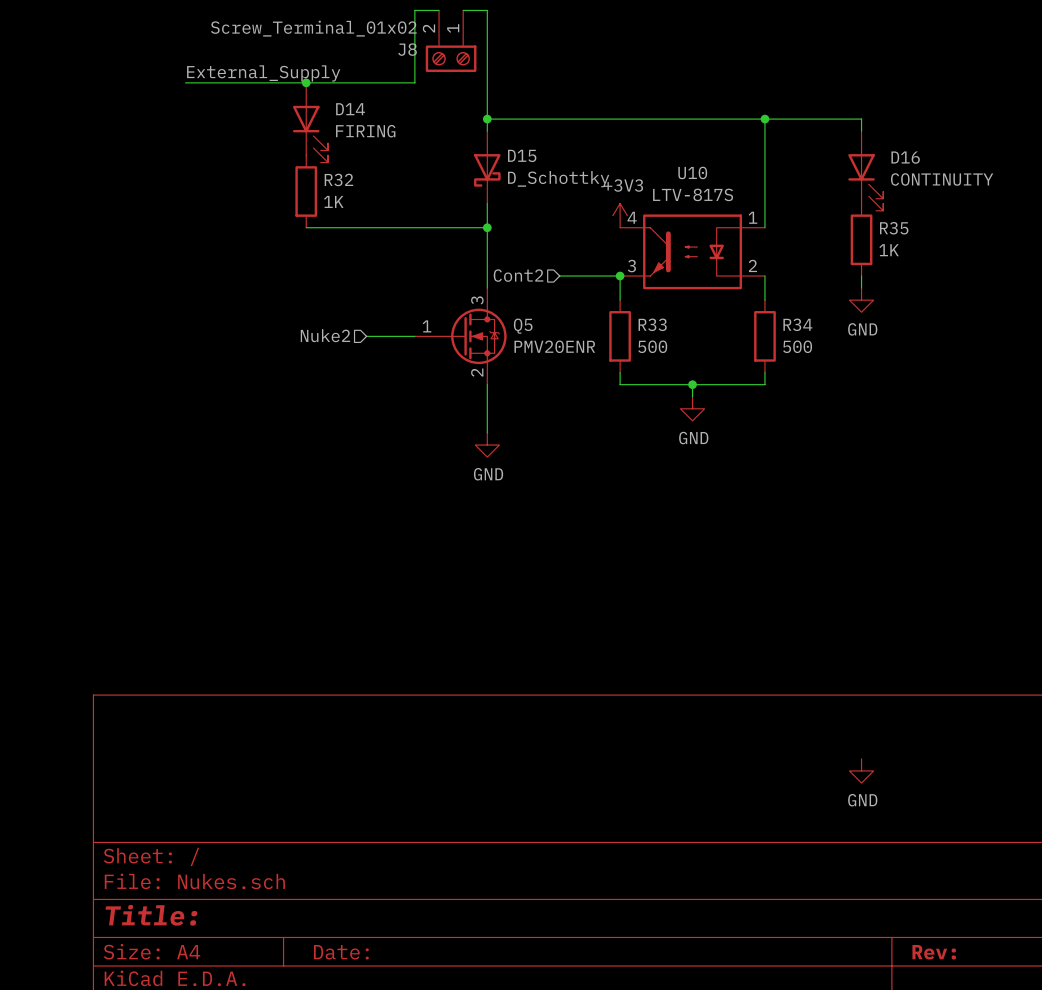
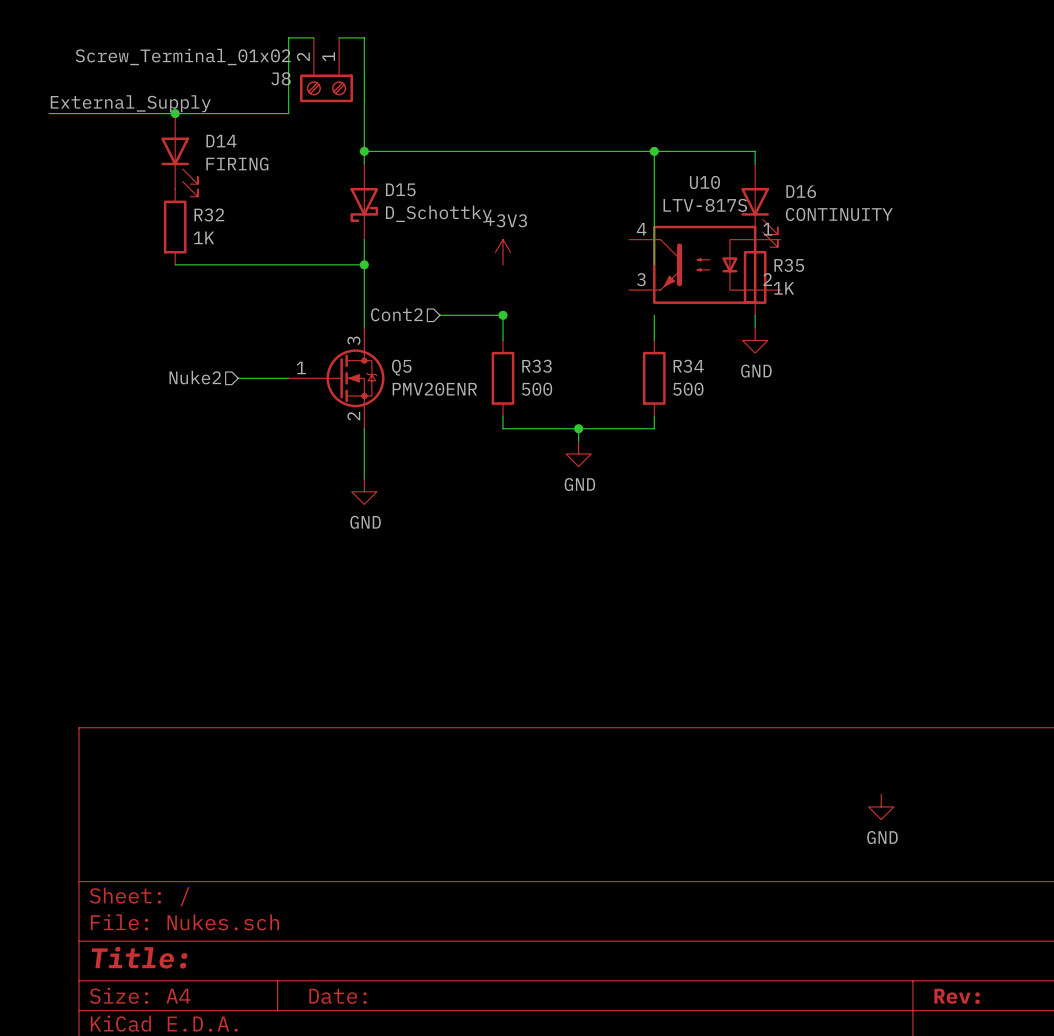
wire: (439, 10) (414, 10) (414, 82) (185, 82) -> (313, 37) (288, 37) (288, 113) (49, 113)
wire: (463, 10) (487, 10) (487, 131) -> (339, 37) (364, 37) (364, 164)
J8 position: (451, 41) -> (326, 70)
label position: External_Supply (263, 73) -> External_Supply (130, 103)
junction: (306, 82) -> none
junction: none -> (175, 113)
wire: (487, 119) (861, 119) (861, 131) -> (364, 151) (755, 151) (755, 164)
junction: (487, 119) -> none
wire: (764, 119) (764, 227) -> (654, 151) (654, 264)
junction: (764, 119) -> none
D14 position: (310, 122) -> (179, 155)
junction: none -> (364, 151)
junction: none -> (654, 151)
D15 position: (487, 167) -> (364, 201)
D16 position: (865, 170) -> (759, 205)
R32 position: (306, 191) -> (175, 227)
wire: (487, 203) (487, 288) -> (364, 239) (364, 327)
power symbol position: +3V3 (620, 215) -> +3V3 (503, 252)
wire: (306, 227) (487, 227) -> (175, 264) (364, 264)
junction: (487, 227) -> none
R35 position: (861, 239) -> (755, 277)
junction: none -> (364, 264)
hierarchical label position: Cont2 (518, 275) -> Cont2 (396, 314)
wire: (559, 276) (620, 276) (620, 300) -> (439, 315) (503, 315) (503, 340)
junction: (620, 276) -> none
wire: (764, 276) (764, 300) -> (654, 315) (654, 340)
wire: (861, 276) (861, 288) -> (755, 315) (755, 327)
junction: none -> (503, 315)
power symbol: GND (861, 300) -> none
power symbol: none -> GND (755, 340)
hierarchical label position: Nuke2 (325, 335) -> Nuke2 (195, 377)
wire: (366, 336) (414, 336) -> (238, 378) (288, 378)
Q5 position: (460, 336) -> (336, 378)
R33 position: (620, 336) -> (503, 378)
R34 position: (764, 336) -> (654, 378)
wire: (620, 372) (620, 384) (764, 384) (764, 372) -> (503, 416) (503, 428) (654, 428) (654, 416)
wire: (487, 384) (487, 432) -> (364, 428) (364, 479)
wire: (692, 384) (692, 396) -> (578, 428) (578, 441)
junction: (692, 384) -> none
junction: none -> (578, 428)
power symbol: GND (692, 408) -> none
power symbol: none -> GND (578, 453)
power symbol: GND (487, 445) -> none
power symbol: none -> GND (364, 491)

